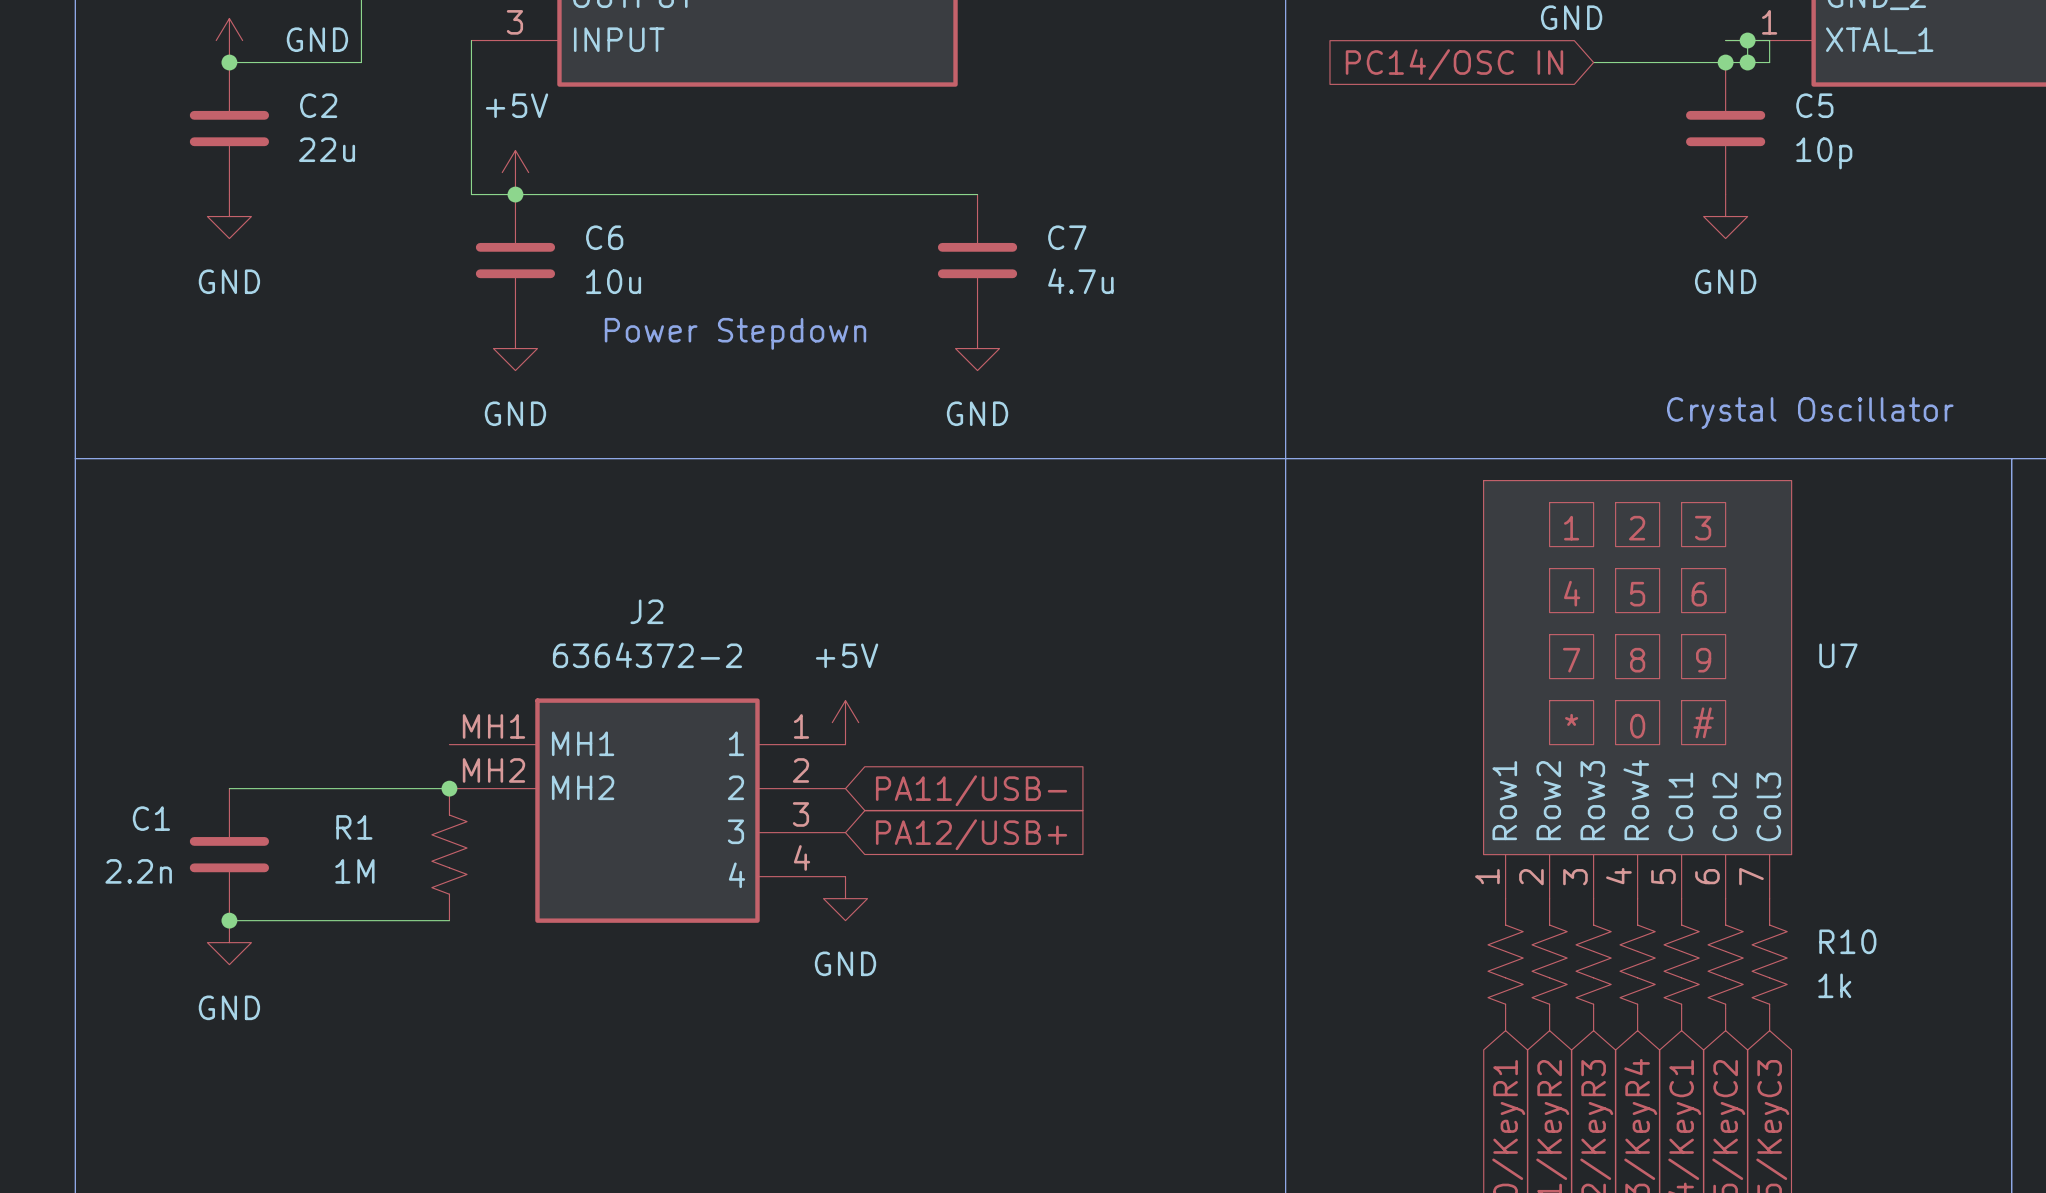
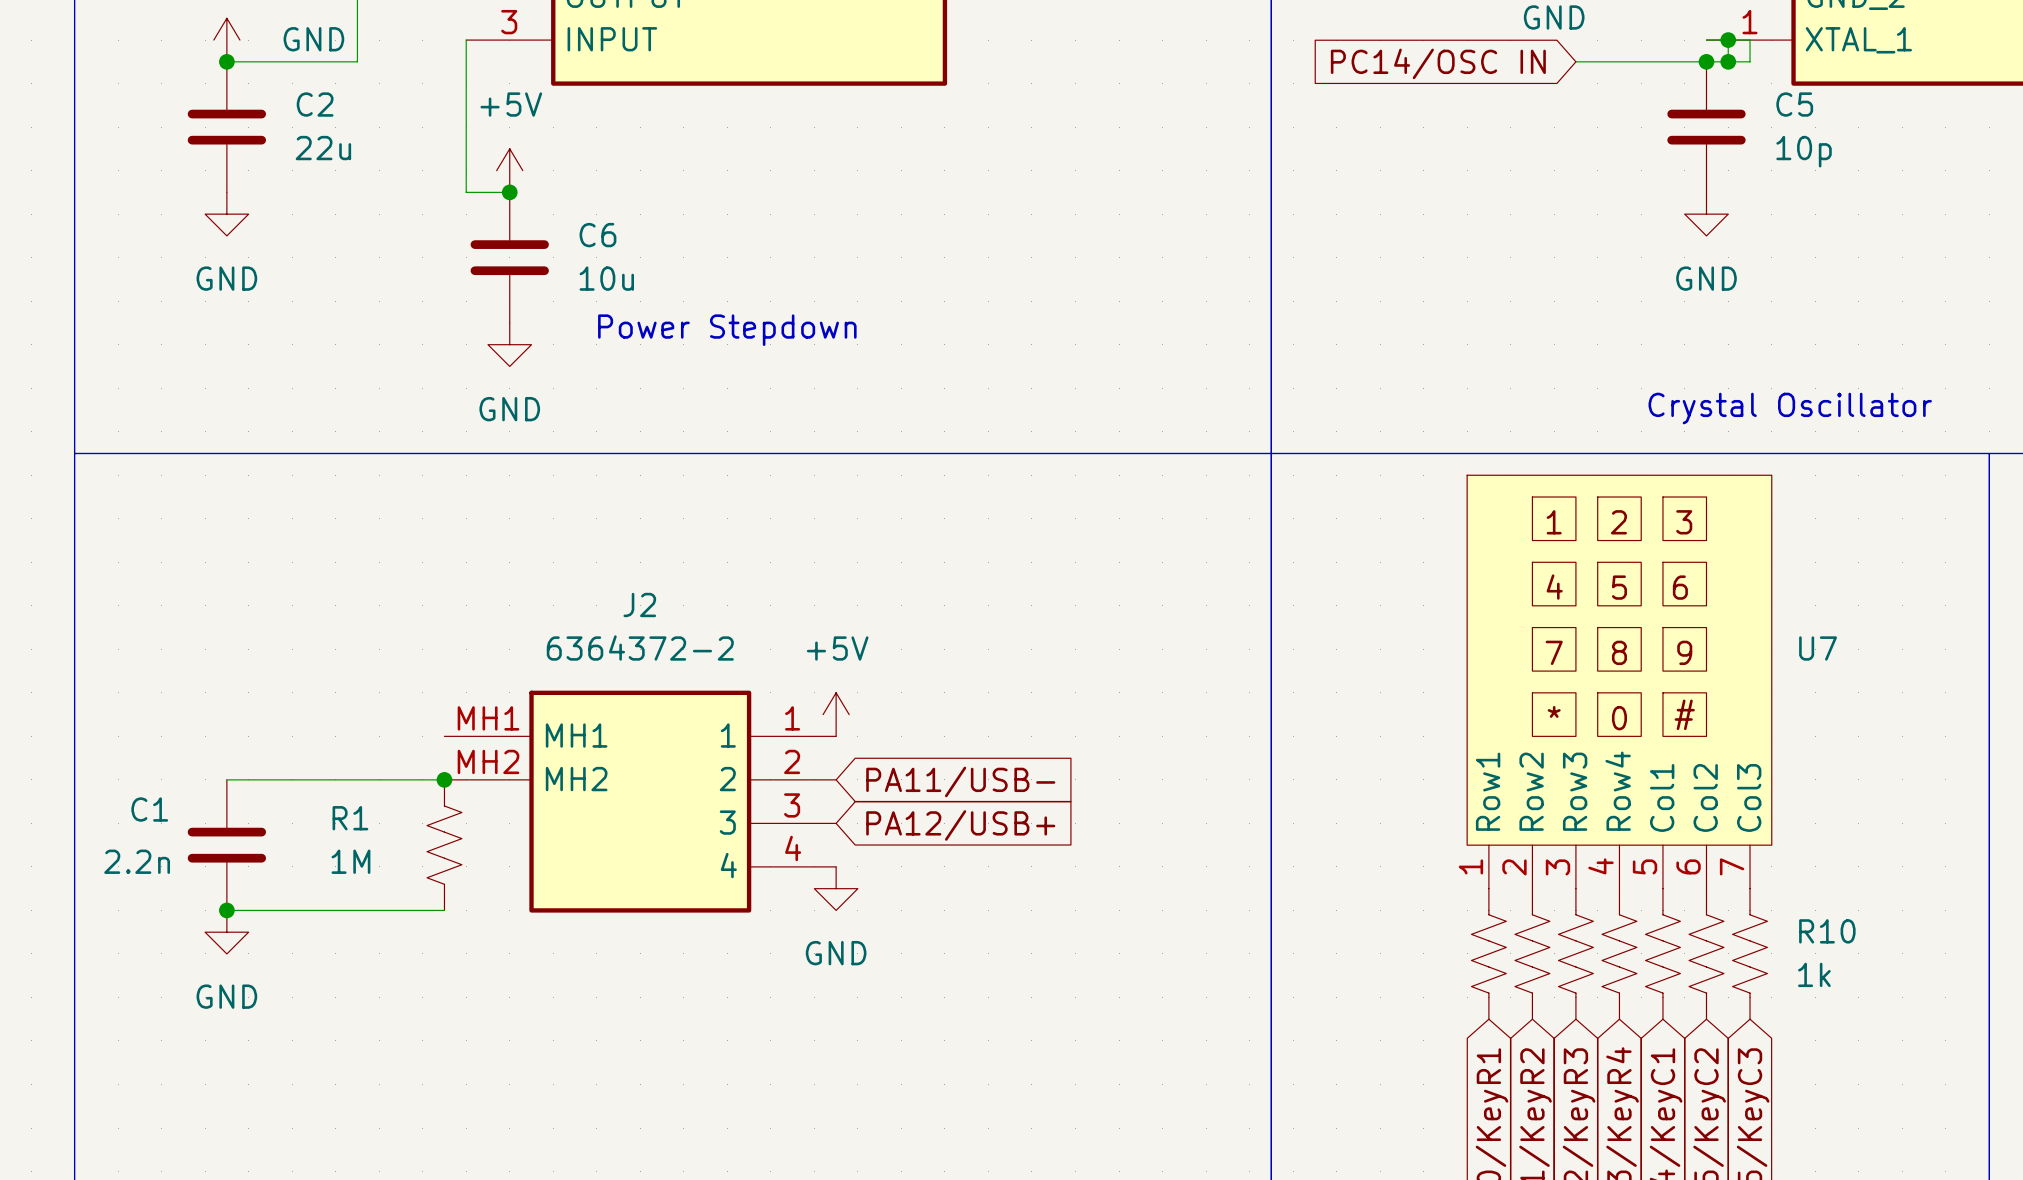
wire: (515, 194) (977, 194) -> none
C7: 4.7u (977, 260) -> none
power symbol: GND (977, 348) -> none

